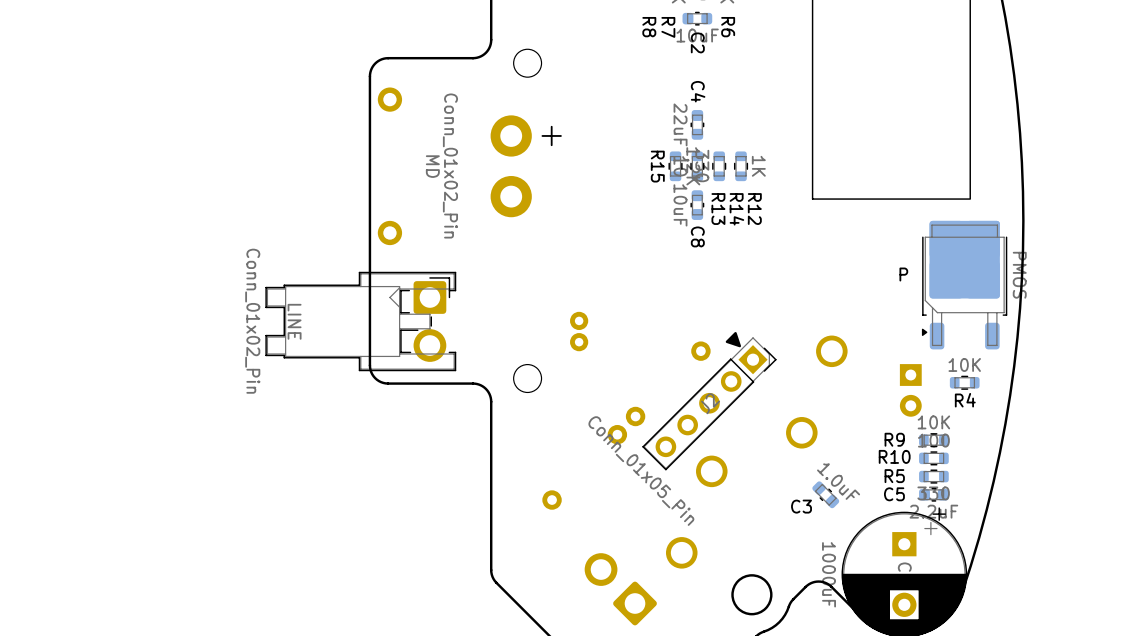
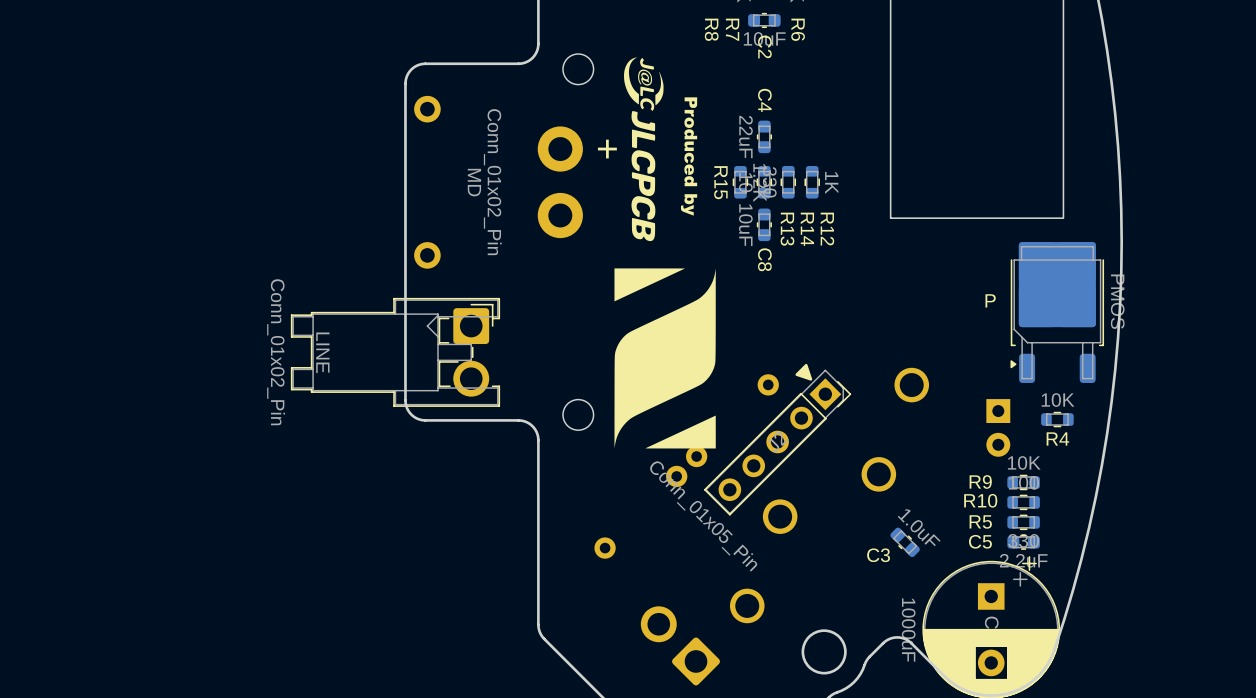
drawing: none -> [624, 57, 664, 242]
drawing: none -> [680, 97, 698, 216]
drawing: none -> [614, 268, 716, 449]

